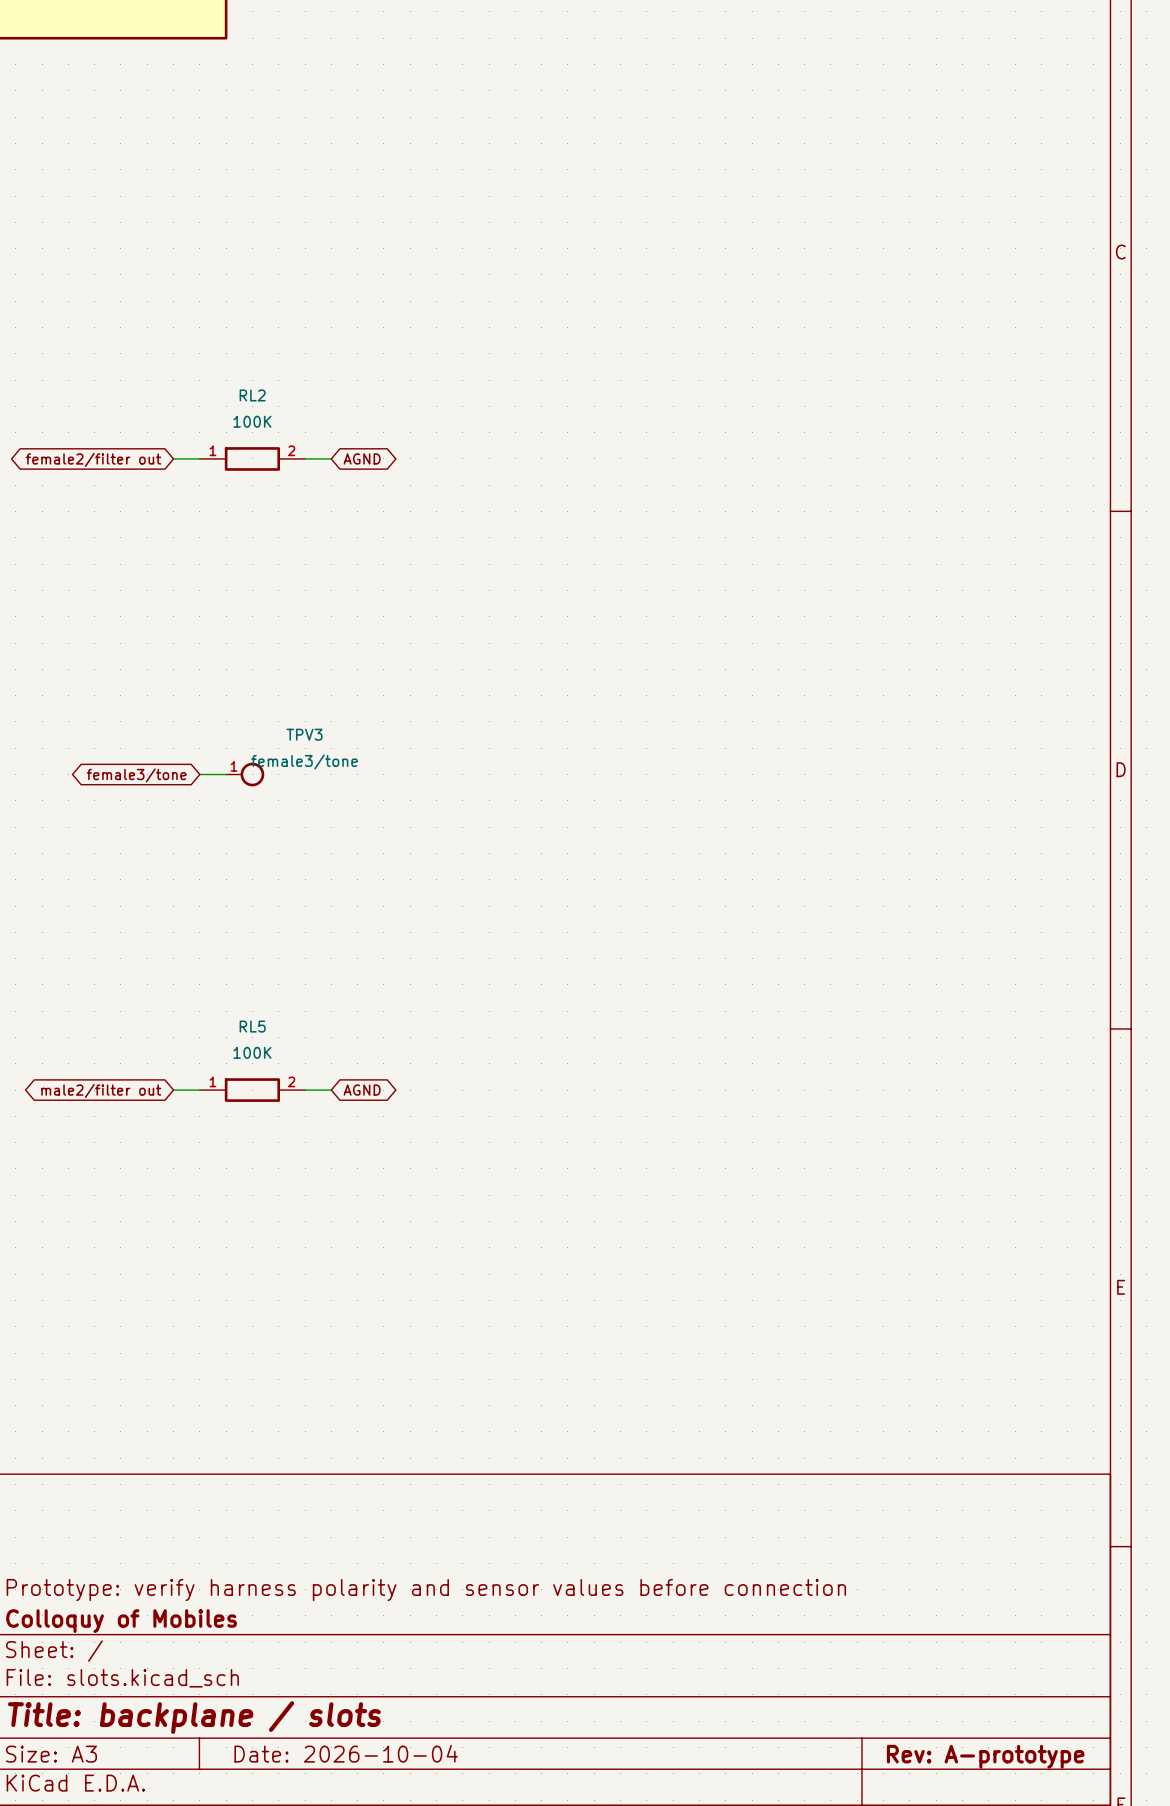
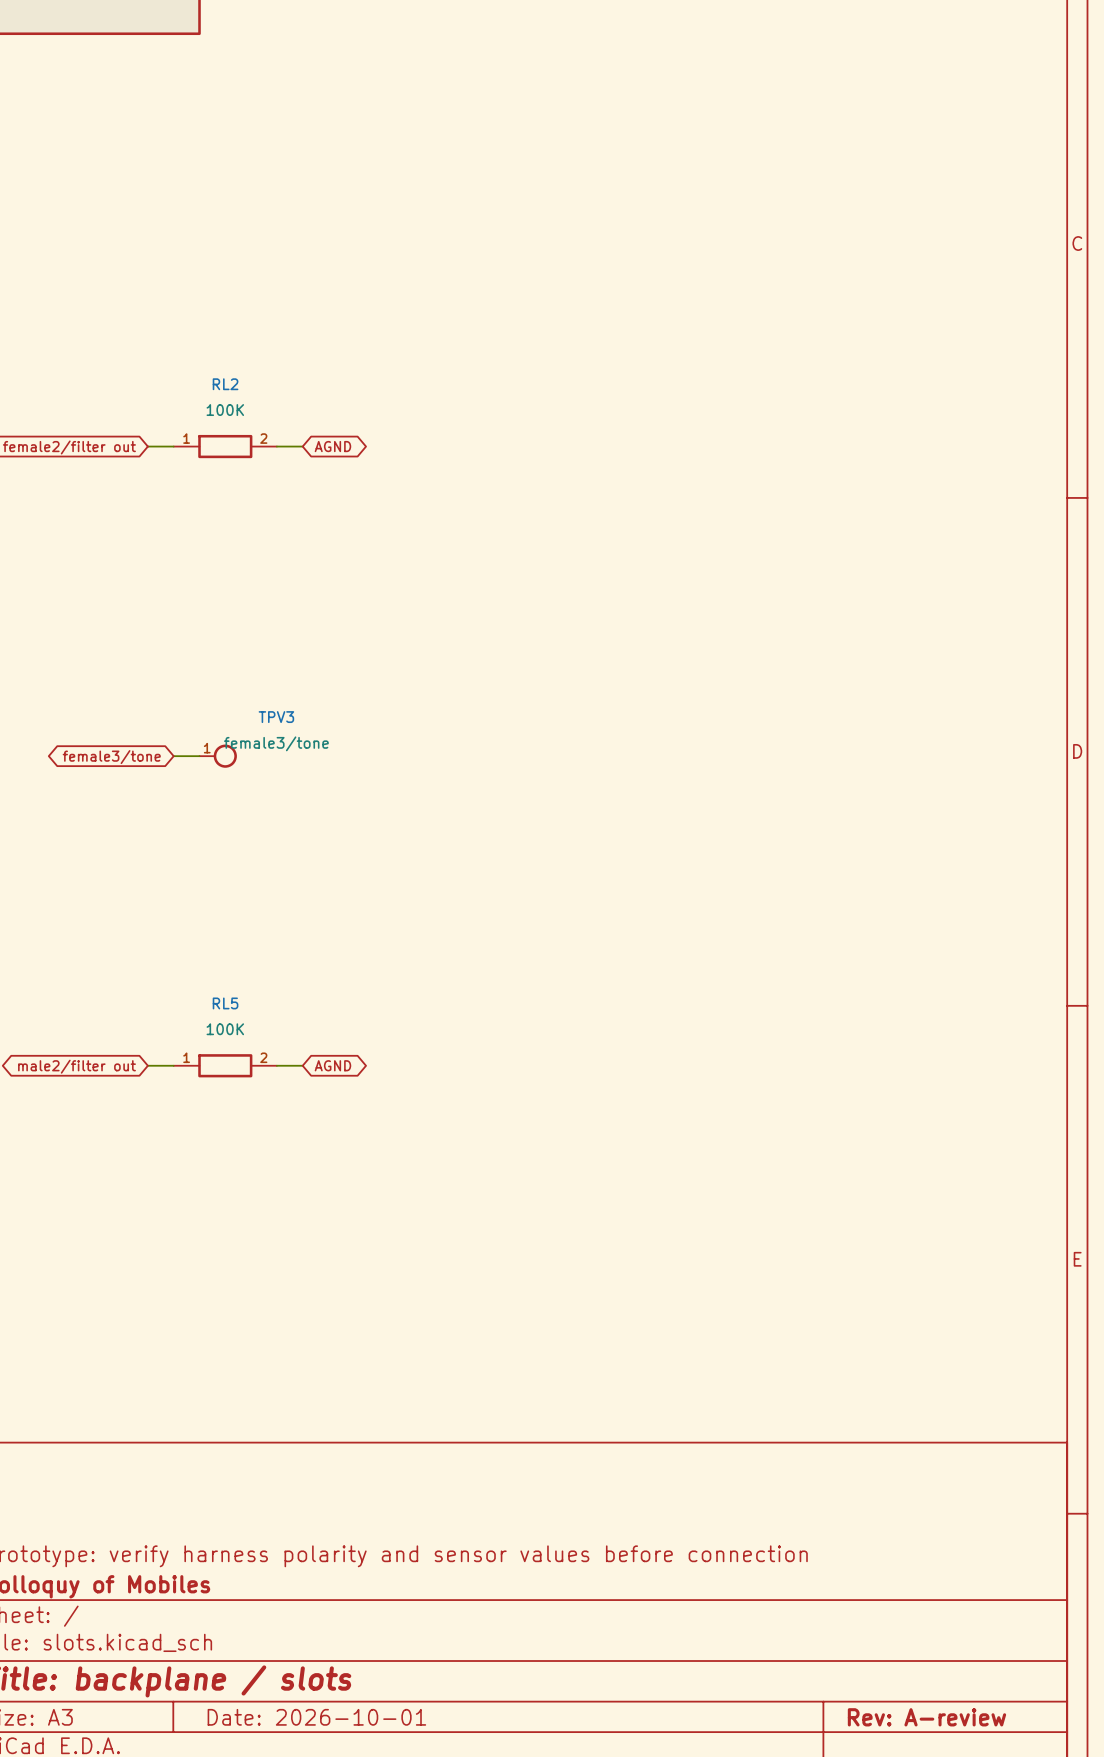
title block: Date: 2026-10-04 (346, 1753) -> Date: 2026-10-01 (316, 1717)
title block: Rev: A-prototype (985, 1756) -> Rev: A-review (926, 1717)

